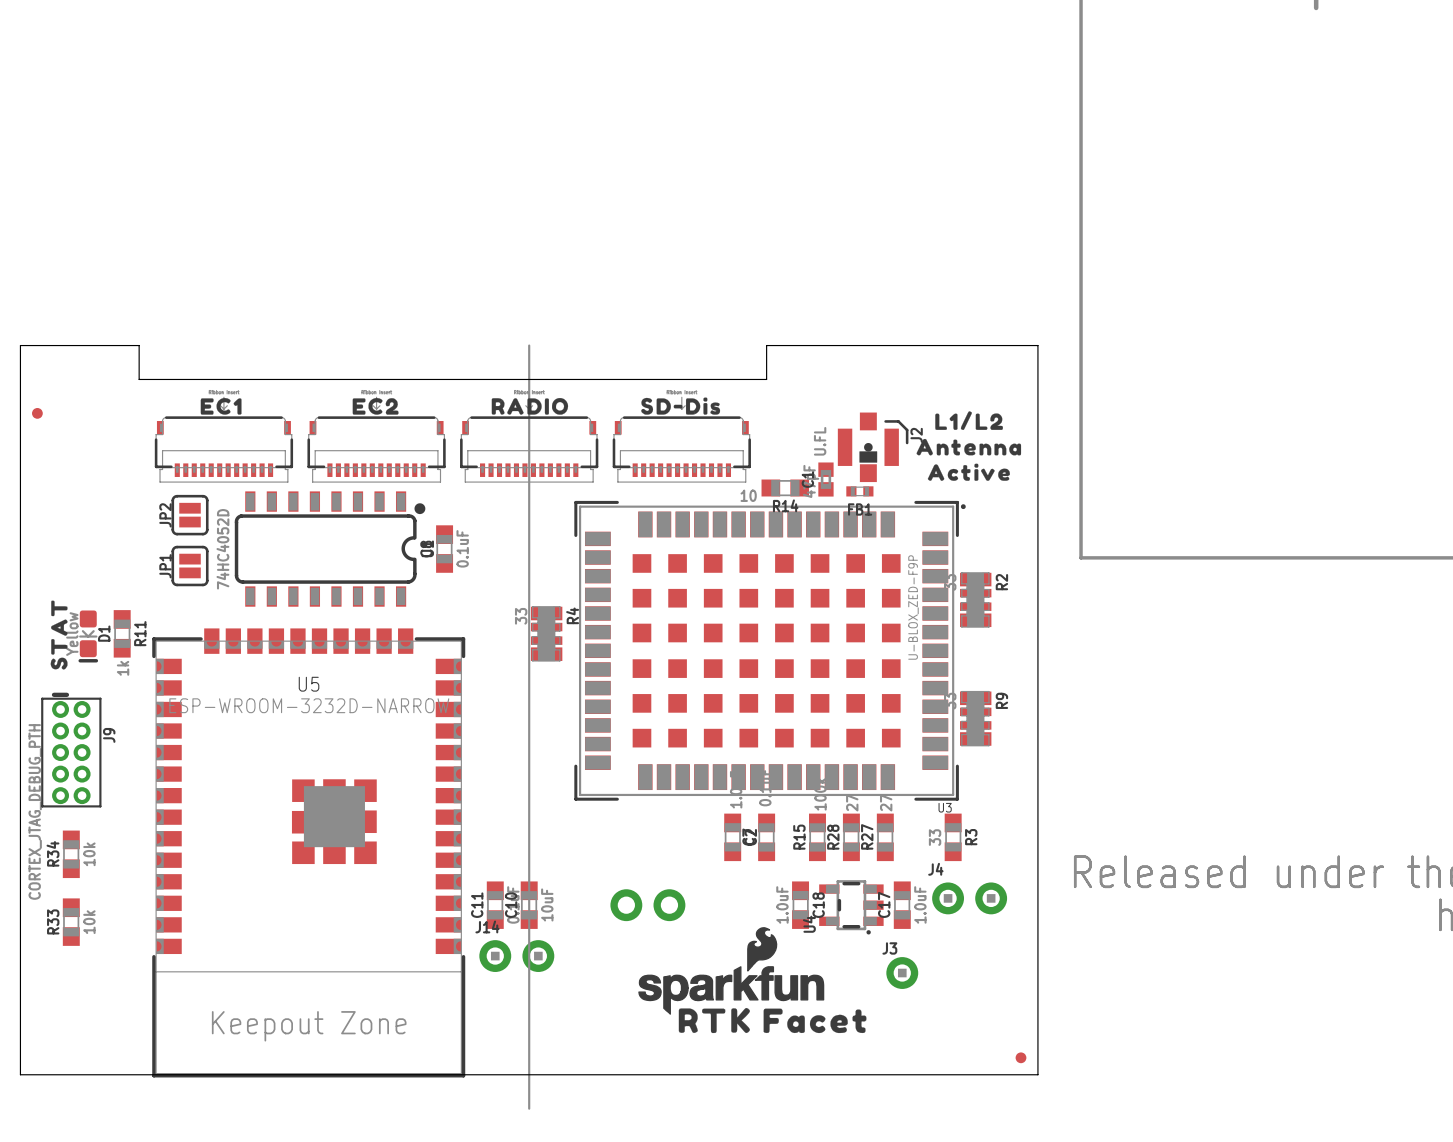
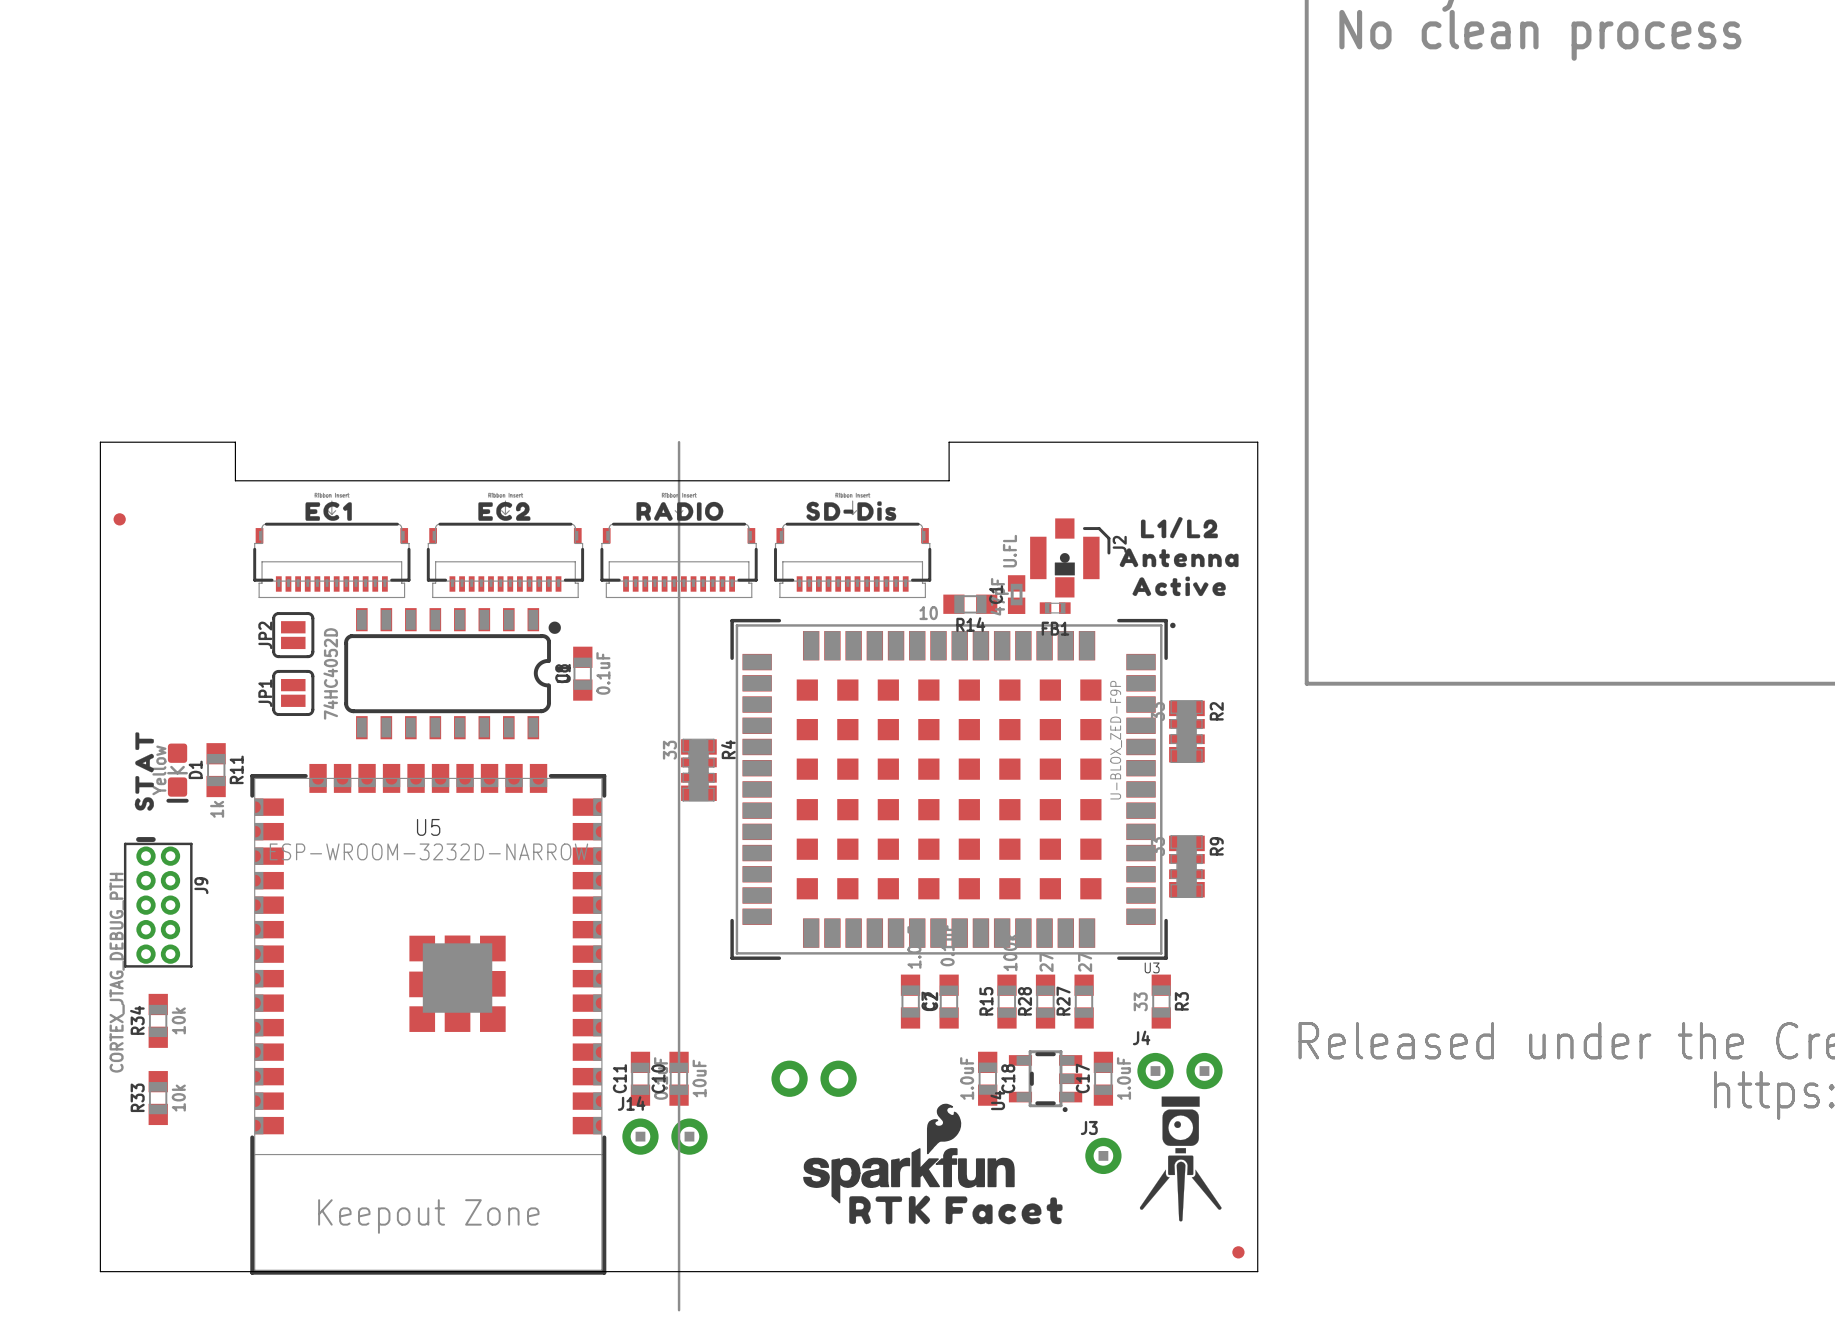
drawing: none -> [1139, 1096, 1222, 1222]

